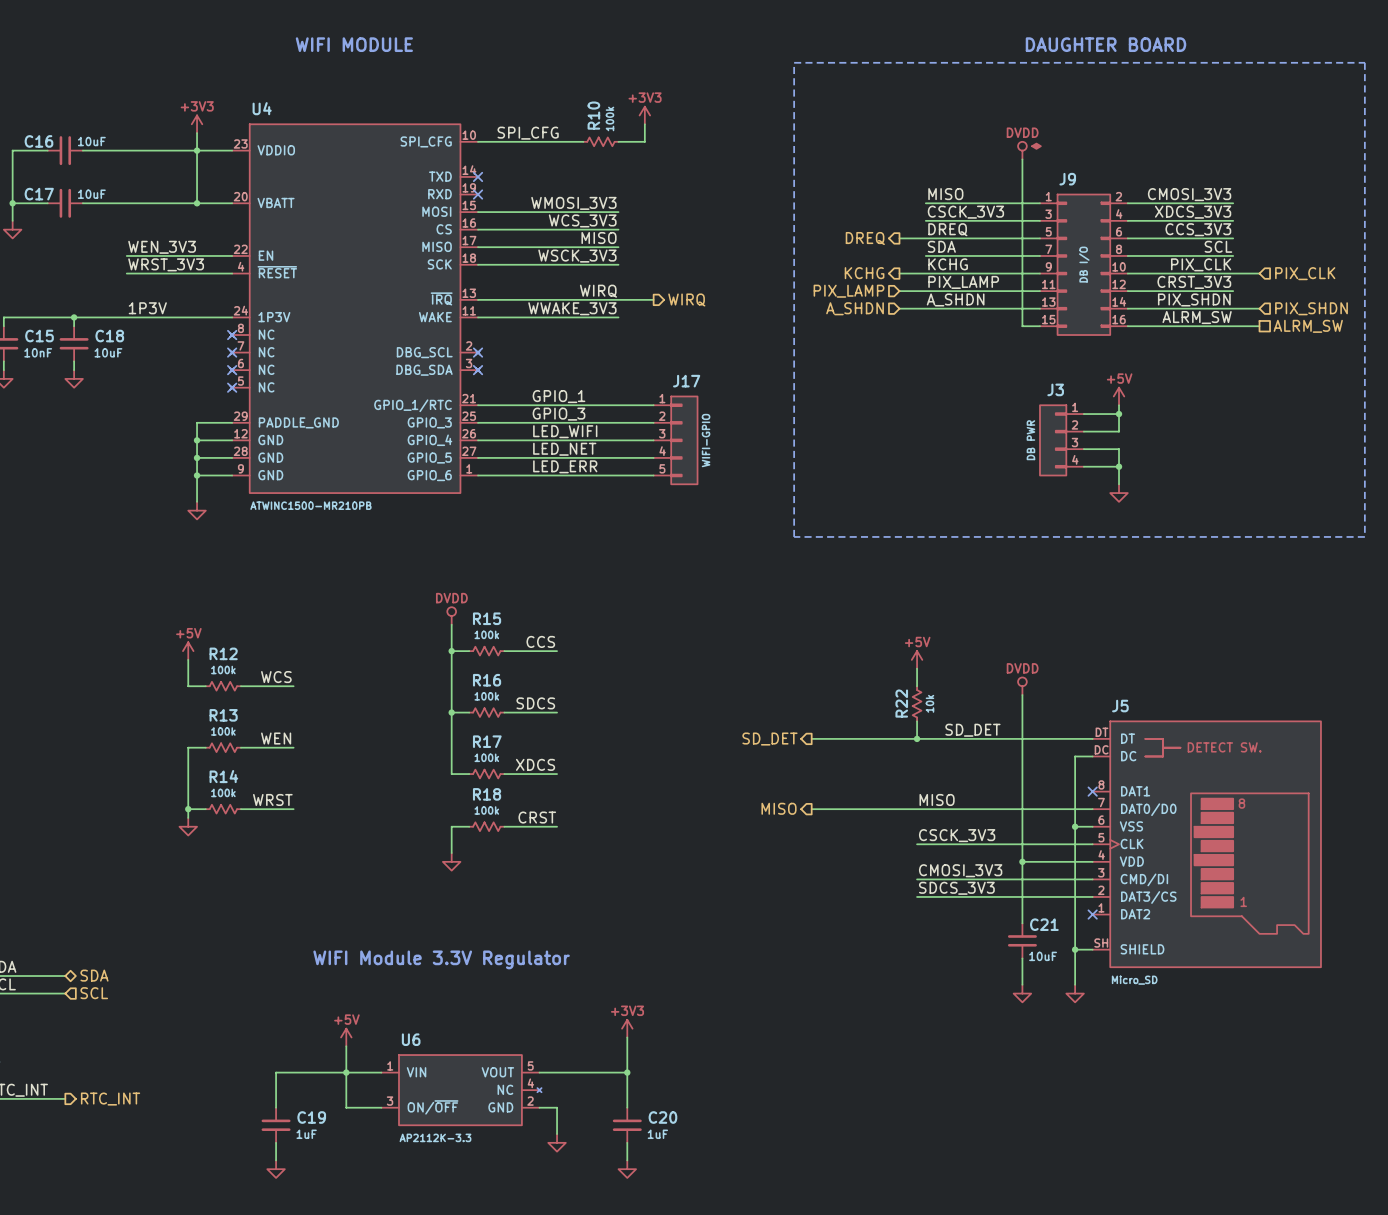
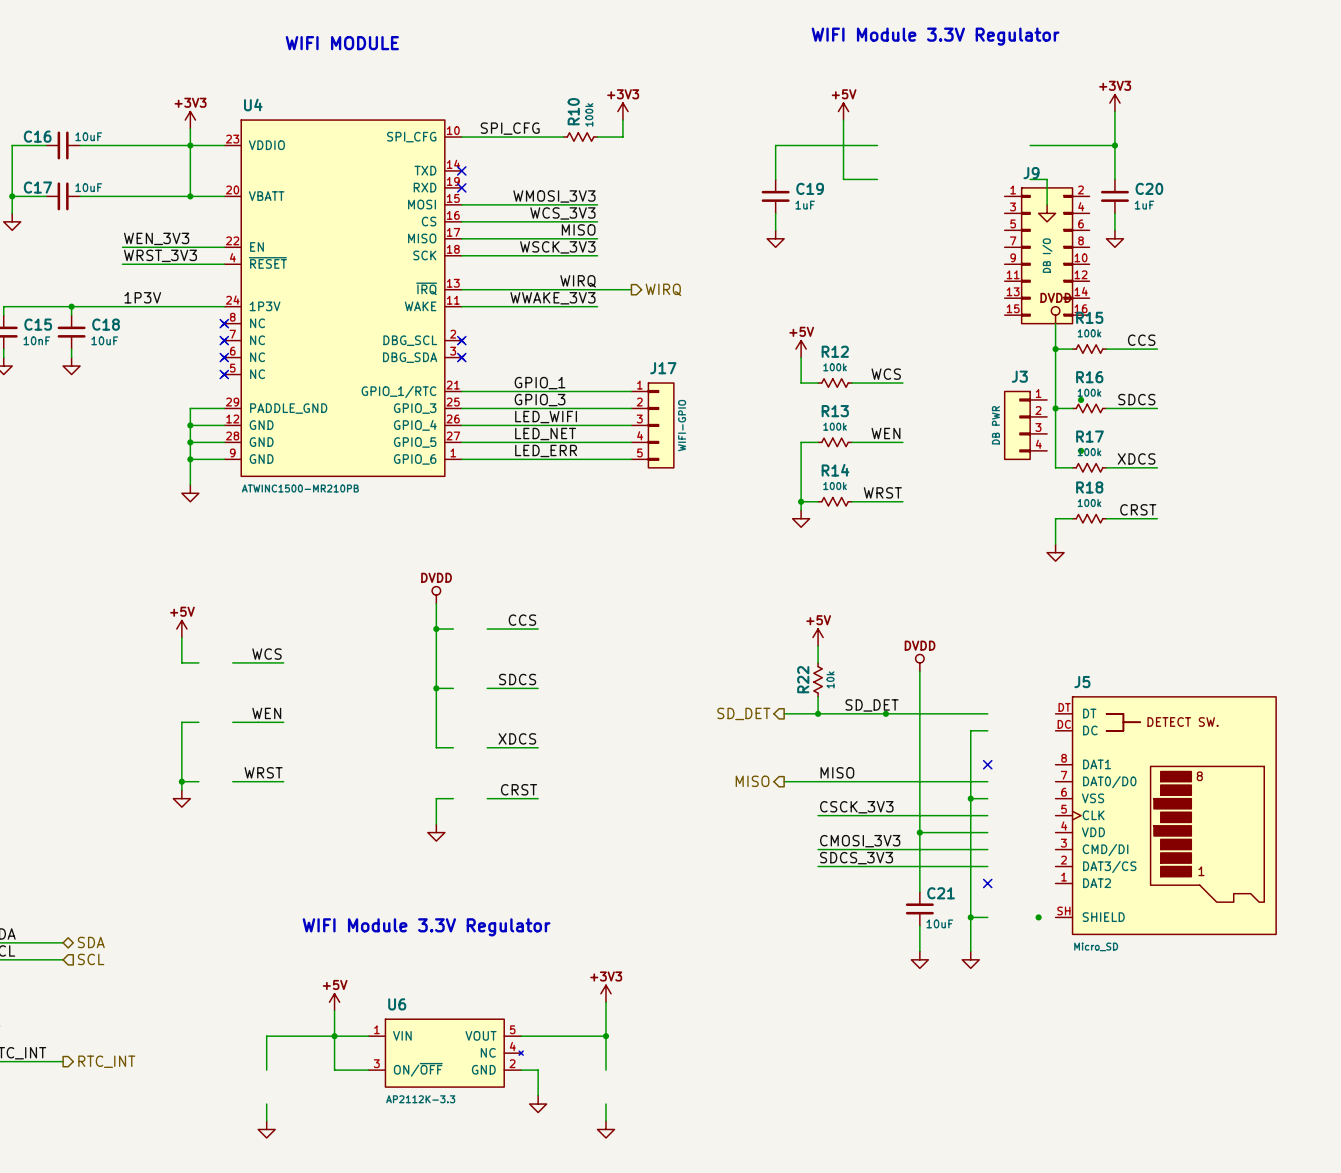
text: none -> WIFI Module 3.3V Regulator (935, 36)
text: DAUGHTER BOARD (1106, 44) -> none
line: (794, 62) (1364, 62) (1364, 536) (794, 536) (794, 62) -> none
power symbol: none -> (1114, 103)
power symbol: none -> (843, 111)
wire: none -> (1114, 111) (1114, 179)
wire: none -> (843, 120) (843, 179) (877, 179)
wire: none -> (877, 145) (775, 145) (775, 179)
power symbol: (1029, 150) -> none
wire: none -> (1030, 145) (1114, 145)
junction: none -> (1114, 145)
wire: (1022, 159) (1022, 326) (1039, 326) -> none
wire: none -> (1030, 179) (1047, 179) (1047, 204)
label: MISO (945, 194) -> none
label: CMOSI_3V3 (1189, 194) -> none
wire: (925, 203) (1039, 203) -> none
wire: (1127, 203) (1233, 203) -> none
label: CSCK_3V3 (965, 212) -> none
label: XDCS_3V3 (1193, 212) -> none
wire: none -> (775, 213) (775, 230)
wire: (925, 220) (1039, 220) -> none
power symbol: none -> (1047, 213)
wire: (1127, 220) (1233, 220) -> none
wire: none -> (1114, 213) (1114, 230)
label: DREQ (947, 229) -> none
label: CCS_3V3 (1198, 229) -> none
hierarchical label: DREQ (865, 238) -> none
wire: (899, 238) (1039, 238) -> none
wire: (1127, 238) (1233, 238) -> none
label: SDA (941, 246) -> none
label: SCL (1218, 246) -> none
power symbol: none -> (775, 238)
power symbol: none -> (1114, 238)
wire: (925, 255) (1039, 255) -> none
wire: (1127, 255) (1233, 255) -> none
label: KCHG (948, 264) -> none
label: PIX_CLK (1201, 264) -> none
hierarchical label: KCHG (864, 273) -> none
wire: (899, 273) (1039, 273) -> none
wire: (1127, 273) (1259, 273) -> none
hierarchical label: PIX_CLK (1305, 273) -> none
label: PIX_LAMP (963, 282) -> none
label: CRST_3V3 (1194, 282) -> none
hierarchical label: PIX_LAMP (849, 291) -> none
wire: (899, 291) (1039, 291) -> none
wire: (1127, 291) (1233, 291) -> none
label: A_SHDN (955, 299) -> none
label: PIX_SHDN (1194, 299) -> none
hierarchical label: A_SHDN (855, 308) -> none
wire: (899, 308) (1039, 308) -> none
wire: (1127, 308) (1259, 308) -> none
hierarchical label: PIX_SHDN (1311, 308) -> none
label: ALRM_SW (1197, 317) -> none
power symbol: none -> (1055, 315)
wire: (1127, 326) (1259, 326) -> none
hierarchical label: ALRM_SW (1308, 326) -> none
wire: none -> (1055, 323) (1055, 467) (1072, 467)
label: none -> CCS (1141, 340)
power symbol: none -> (801, 349)
wire: none -> (1055, 349) (1072, 349)
junction: none -> (1055, 349)
wire: none -> (1106, 349) (1157, 349)
wire: none -> (801, 357) (801, 383) (818, 383)
label: none -> WCS (886, 374)
wire: none -> (851, 383) (902, 383)
power symbol: (1119, 396) -> none
wire: (1119, 405) (1119, 431) (1083, 431) -> none
label: none -> SDCS (1136, 399)
wire: (1083, 414) (1119, 414) -> none
wire: none -> (1055, 408) (1072, 408)
junction: none -> (1055, 408)
wire: none -> (1106, 408) (1157, 408)
label: none -> WEN (885, 433)
wire: (1083, 449) (1119, 449) (1119, 484) -> none
wire: none -> (818, 442) (801, 442) (801, 510)
wire: none -> (851, 442) (902, 442)
wire: (1083, 466) (1119, 466) -> none
label: none -> XDCS (1136, 458)
wire: none -> (1106, 467) (1157, 467)
power symbol position: (1119, 493) -> (1055, 552)
label: none -> WRST (882, 492)
wire: none -> (801, 501) (818, 501)
junction: none -> (801, 501)
wire: none -> (851, 501) (902, 501)
label: none -> CRST (1138, 509)
power symbol: none -> (801, 518)
wire: none -> (1072, 518) (1055, 518) (1055, 544)
R15 position: (486, 651) -> (1089, 349)
power symbol position: (917, 659) -> (818, 637)
wire: (917, 668) (917, 686) -> (818, 645) (818, 662)
R12 position: (223, 686) -> (835, 383)
power symbol position: (1022, 686) -> (919, 662)
wire: (1022, 695) (1022, 923) -> (919, 671) (919, 891)
R22 position: (917, 703) -> (818, 679)
R16 position: (486, 712) -> (1089, 408)
wire: (917, 721) (917, 738) -> (818, 696) (818, 713)
label position: SD_DET (972, 730) -> SD_DET (872, 705)
junction: none -> (818, 713)
wire: (1022, 738) (1092, 738) -> none
R13 position: (223, 747) -> (835, 442)
wire: (1092, 756) (1075, 756) (1075, 984) -> (987, 730) (970, 730) (970, 951)
R17 position: (486, 774) -> (1089, 467)
no-connect mark: none -> (987, 764)
no-connect mark: (1092, 791) -> none
label position: MISO (937, 799) -> MISO (837, 772)
R14 position: (223, 809) -> (835, 501)
wire: (1022, 809) (1092, 809) -> none
R18 position: (486, 826) -> (1089, 518)
junction: none -> (970, 798)
wire: (1075, 826) (1092, 826) -> (970, 798) (987, 798)
junction: (1075, 826) -> none
label position: CSCK_3V3 (957, 835) -> CSCK_3V3 (856, 807)
wire: none -> (818, 815) (885, 815)
wire: (1022, 844) (1092, 844) -> none
junction: none -> (919, 832)
wire: (1022, 861) (1092, 861) -> (987, 832) (919, 832)
junction: (1022, 861) -> none
label position: CMOSI_3V3 (960, 870) -> CMOSI_3V3 (860, 841)
wire: none -> (818, 849) (885, 849)
wire: (1022, 879) (1092, 879) -> none
label position: SDCS_3V3 (956, 888) -> SDCS_3V3 (856, 858)
wire: none -> (818, 866) (885, 866)
wire: (1022, 896) (1092, 896) -> none
no-connect mark: none -> (987, 883)
no-connect mark: (1092, 914) -> none
C21 position: (1022, 940) -> (919, 908)
junction: none -> (970, 917)
wire: (1075, 949) (1092, 949) -> (970, 917) (987, 917)
wire: (1022, 958) (1022, 984) -> (919, 925) (919, 951)
power symbol: none -> (919, 959)
power symbol position: (1022, 993) -> (970, 959)
power symbol: (1075, 993) -> none
C19 position: (276, 1125) -> (775, 196)
C20 position: (627, 1125) -> (1114, 196)

